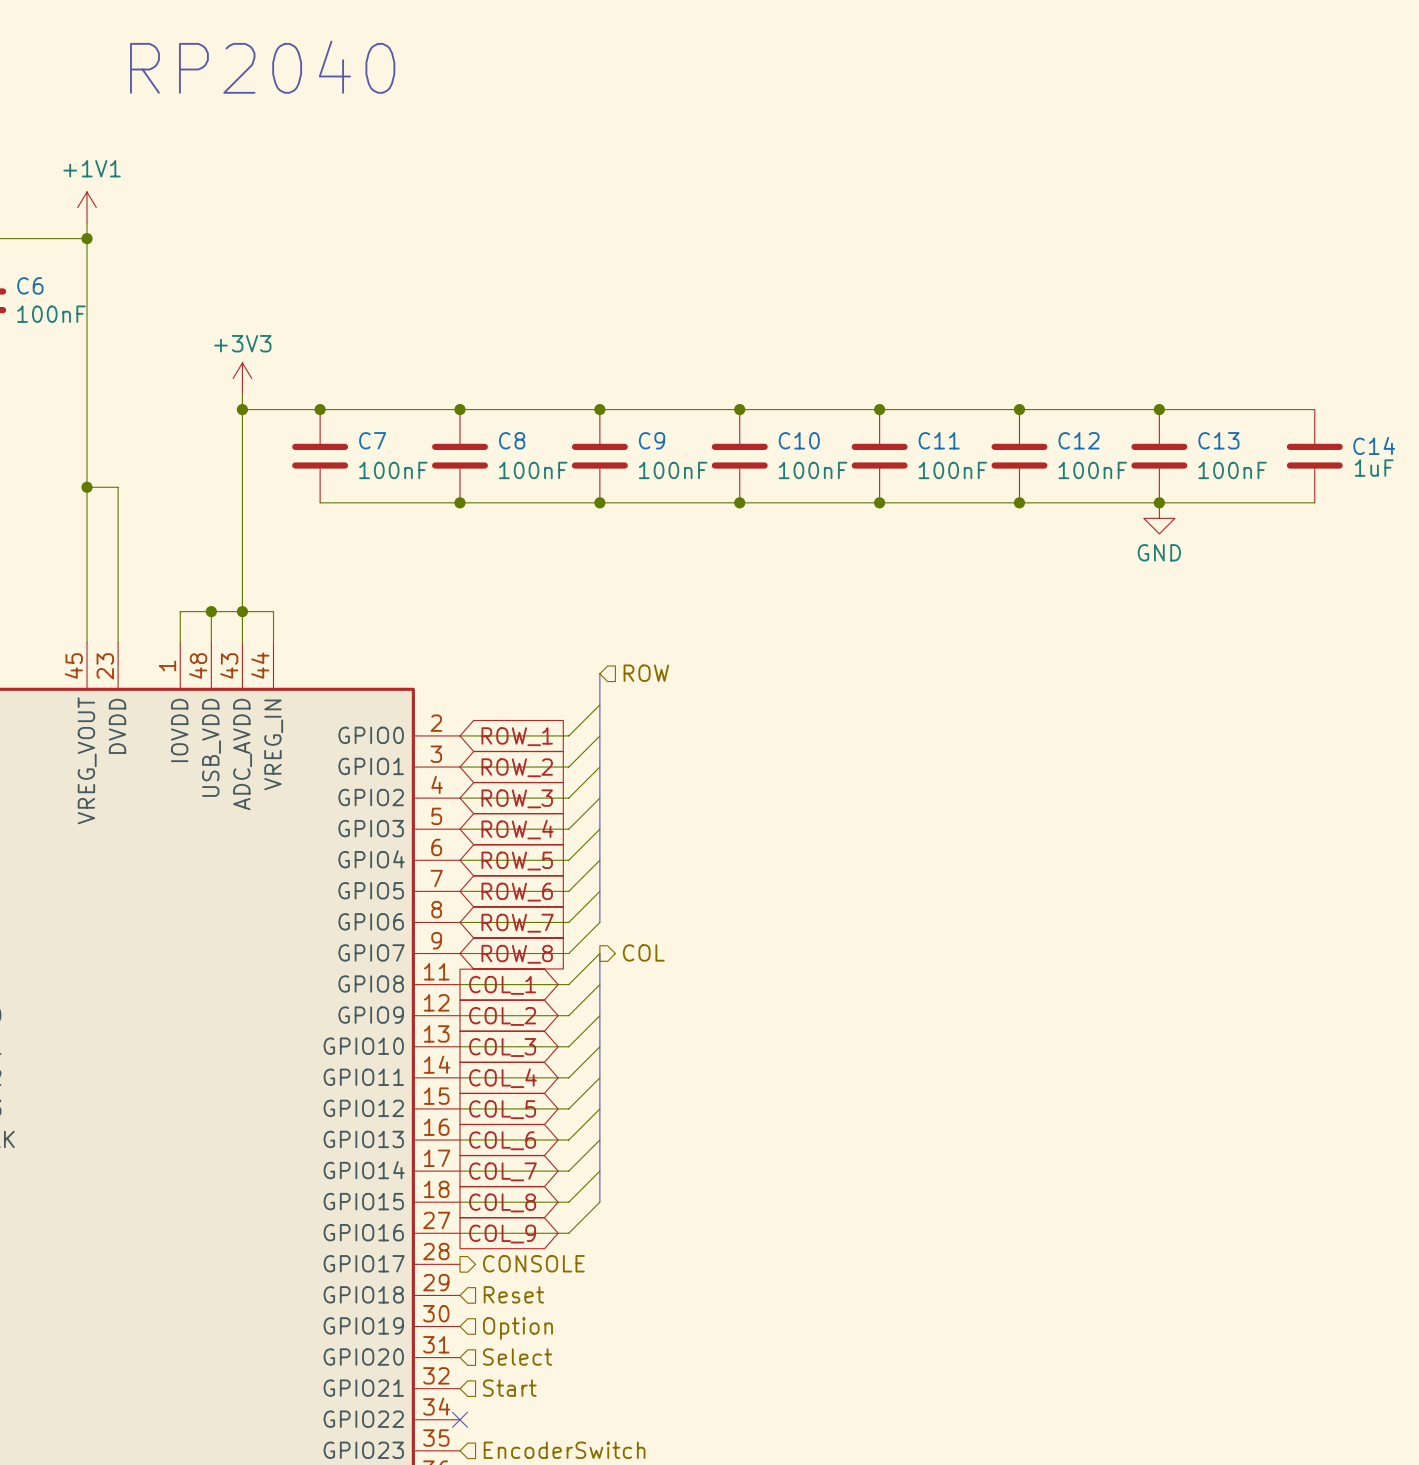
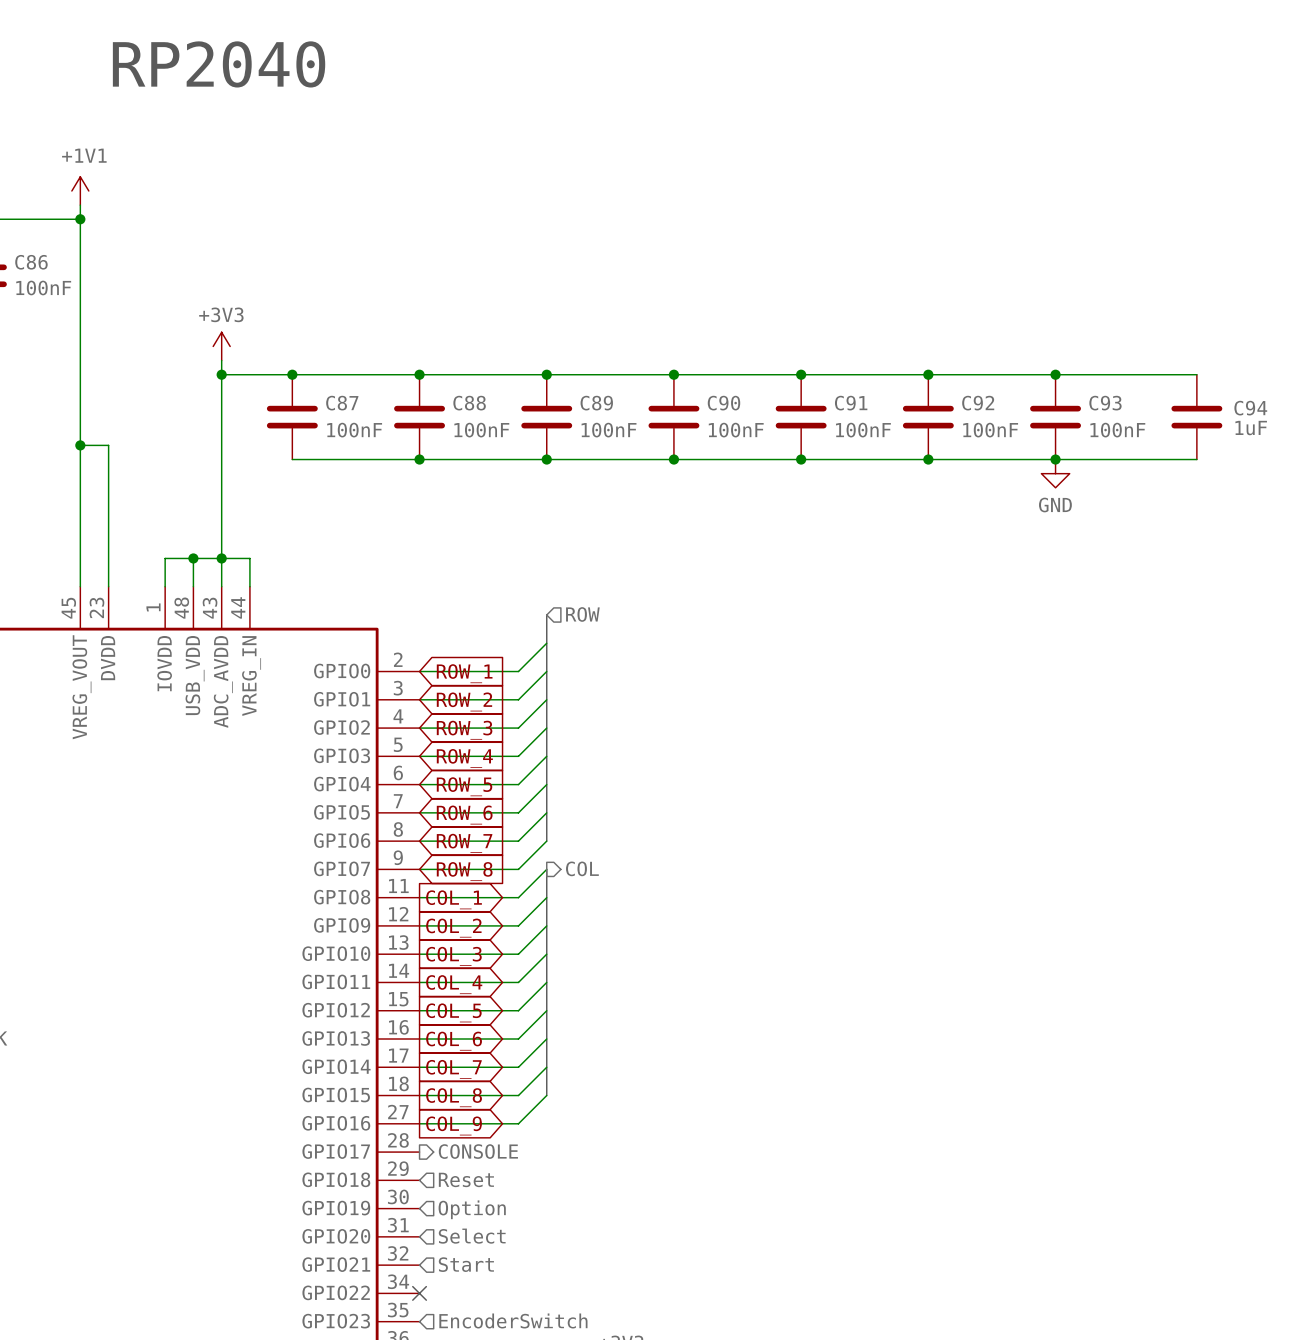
C6 name: C6 (30, 285) -> C86 (31, 262)
C7 name: C7 (372, 440) -> C87 (342, 403)
C8 name: C8 (512, 440) -> C88 (469, 403)
C9 name: C9 (652, 440) -> C89 (596, 403)
C10 name: C10 (799, 440) -> C90 (723, 403)
C11 name: C11 (939, 440) -> C91 (851, 403)
C12 name: C12 (1079, 440) -> C92 (978, 403)
C13 name: C13 (1218, 440) -> C93 (1105, 403)
C14 name: C14 (1374, 445) -> C94 (1250, 408)

